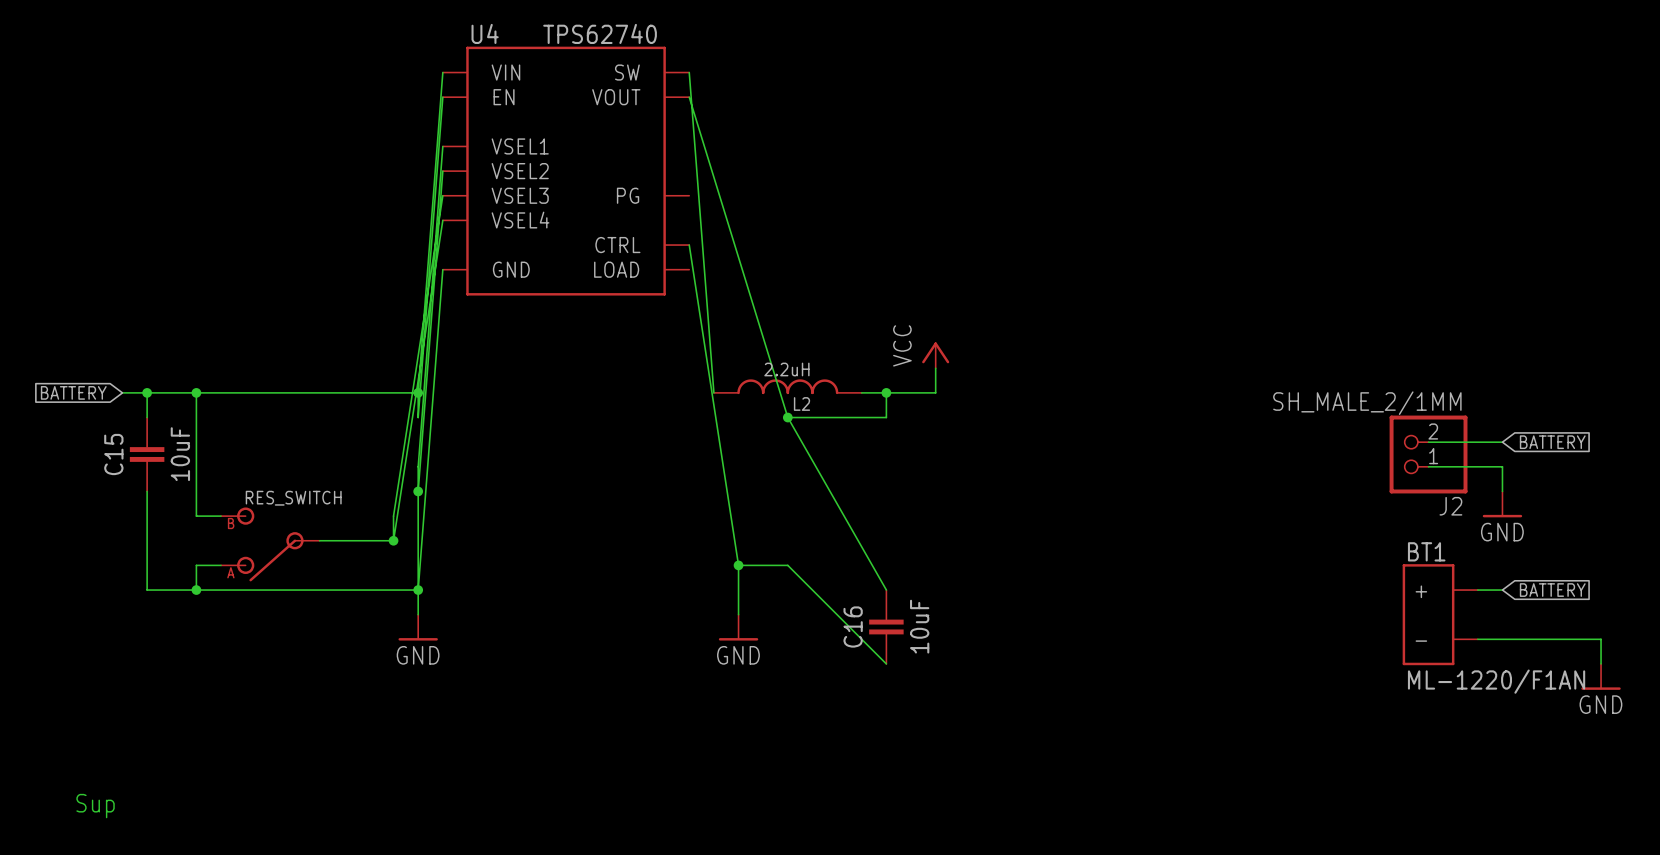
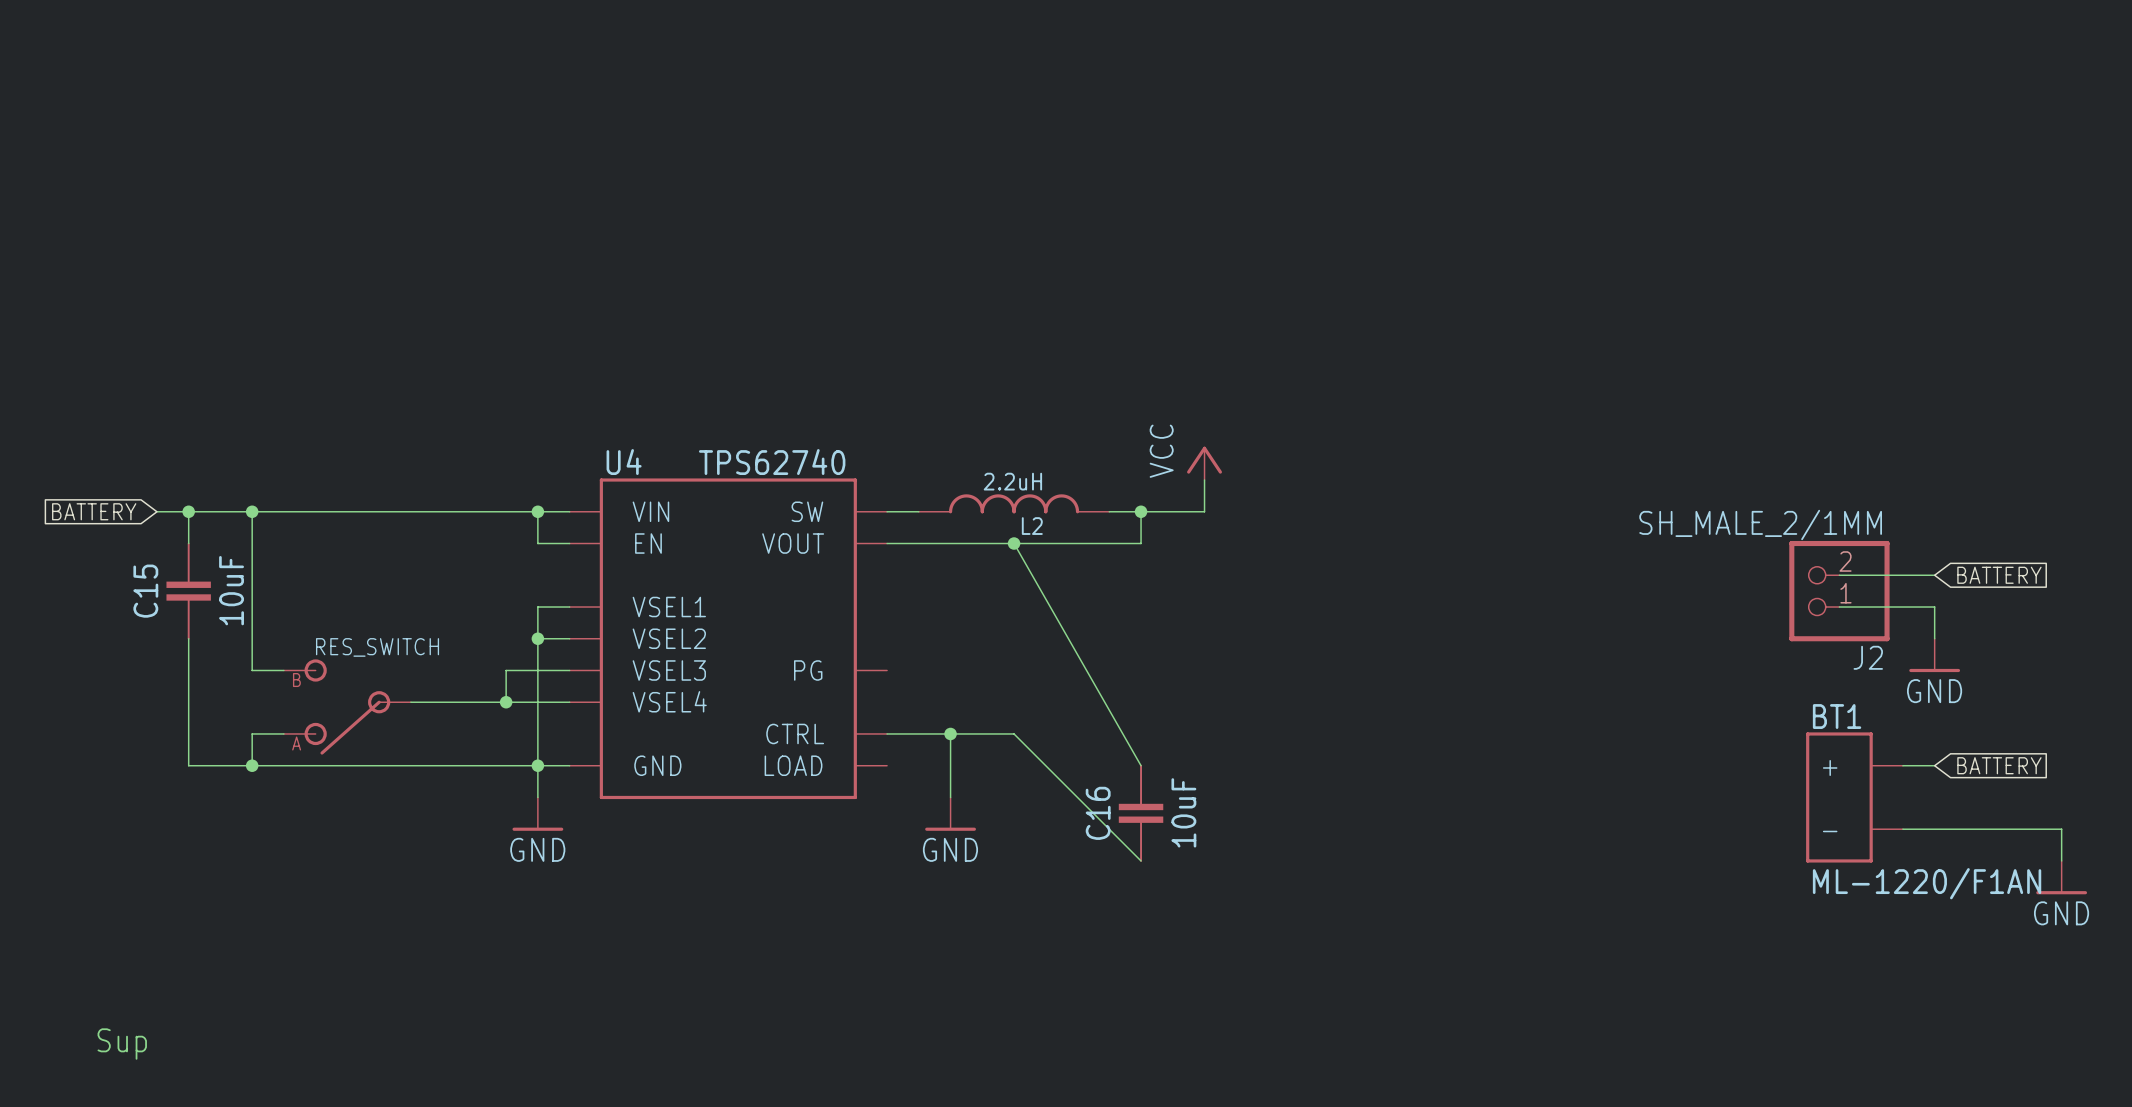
wire: (442, 72) (418, 392) -> (569, 511) (537, 511)
wire: (689, 72) (713, 392) -> (887, 511) (918, 511)
wire: (442, 97) (418, 417) -> (569, 543) (537, 543)
wire: (689, 97) (787, 417) -> (887, 543) (1014, 543)
wire: (442, 146) (418, 466) -> (569, 607) (537, 607)
wire: (442, 171) (418, 491) -> (569, 638) (537, 638)
U4 position: (566, 171) -> (728, 638)
wire: (442, 195) (393, 516) -> (569, 670) (506, 670)
wire: (442, 220) (393, 540) -> (569, 702) (506, 702)
wire: (689, 245) (738, 565) -> (887, 733) (950, 733)
wire: (442, 269) (418, 590) -> (569, 765) (537, 765)

